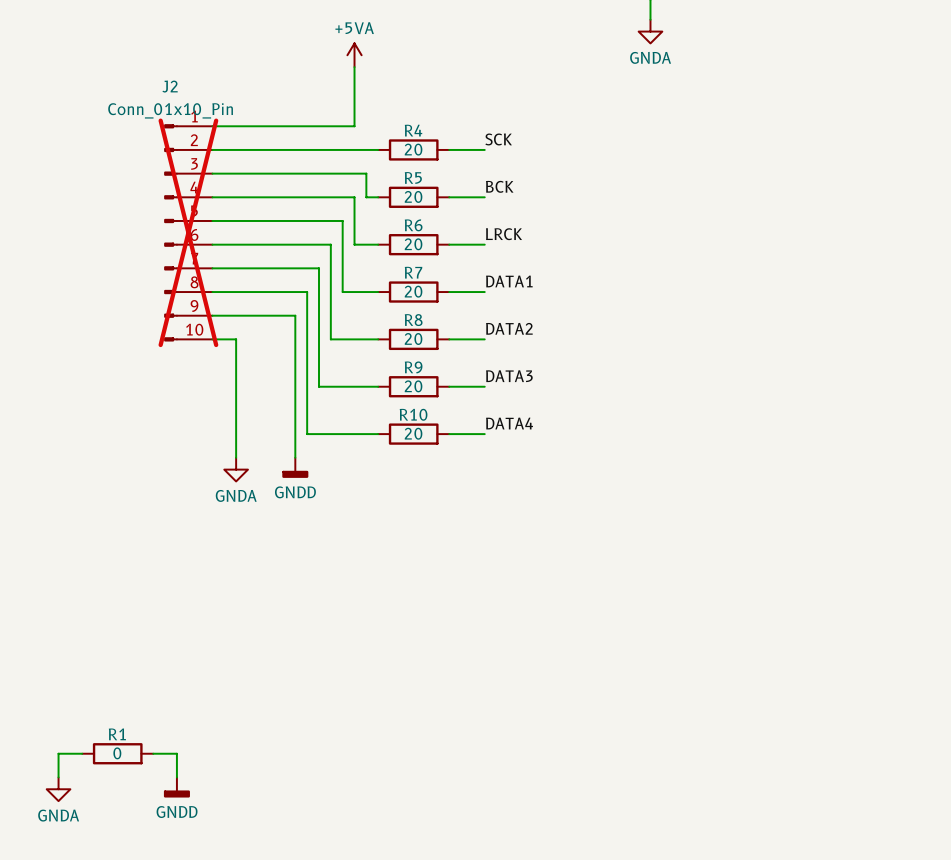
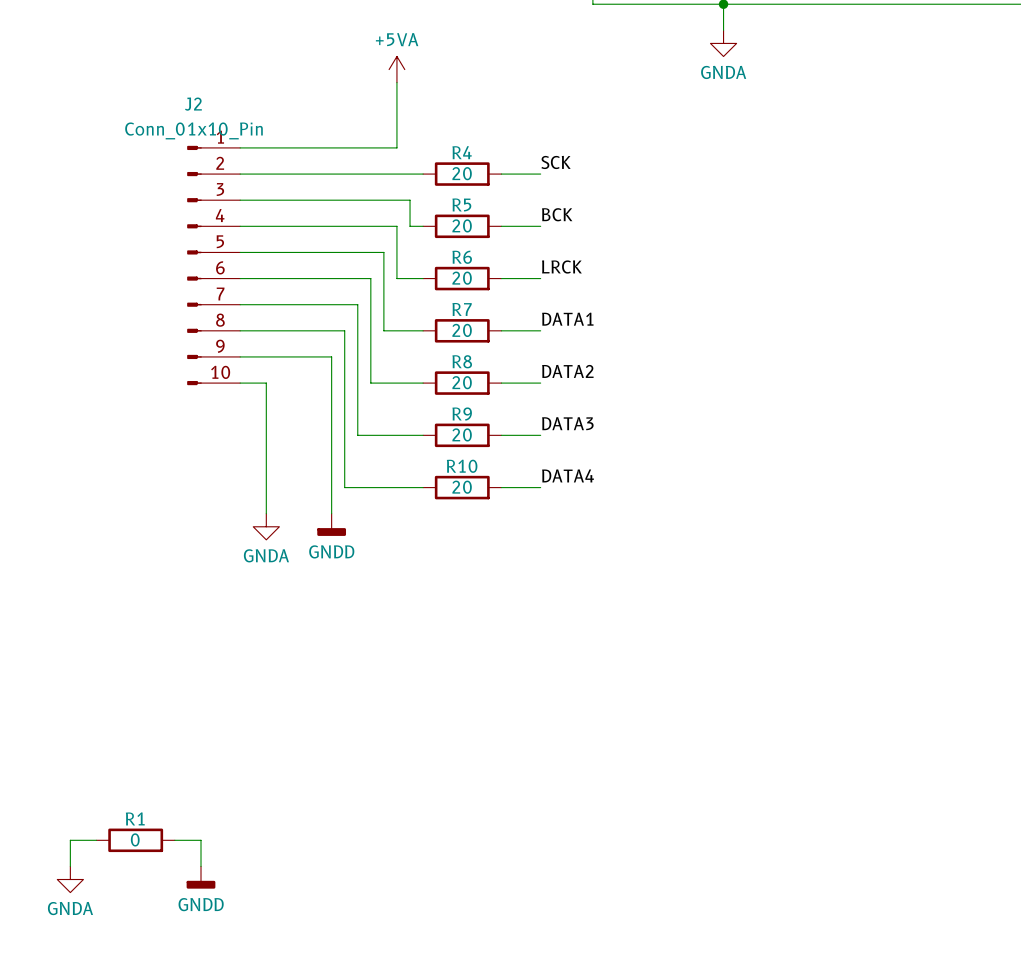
J2 do-not-place cross: (188, 232) -> none

